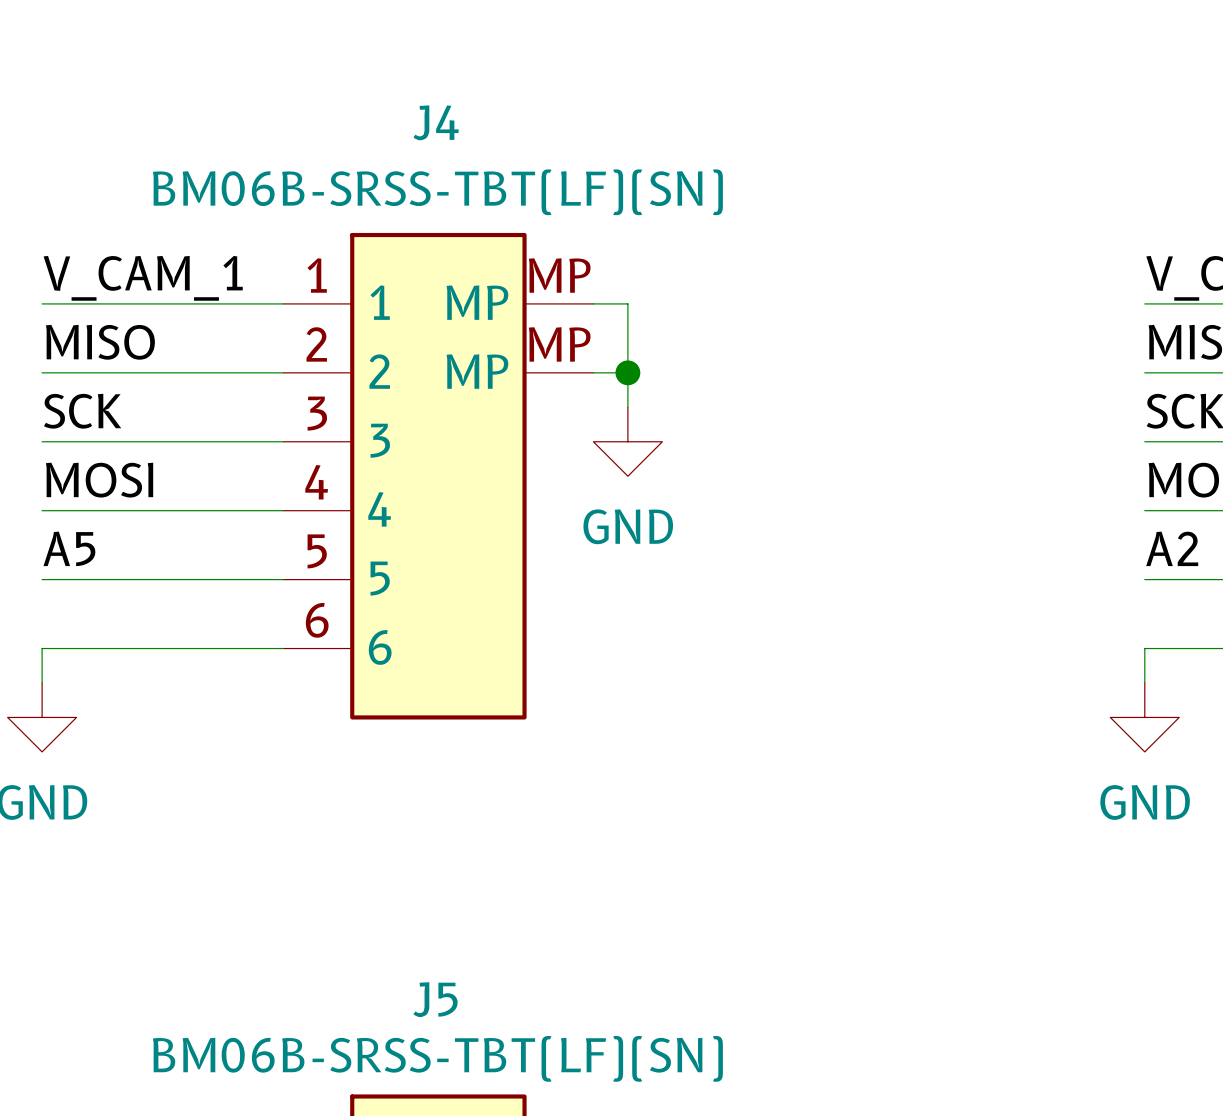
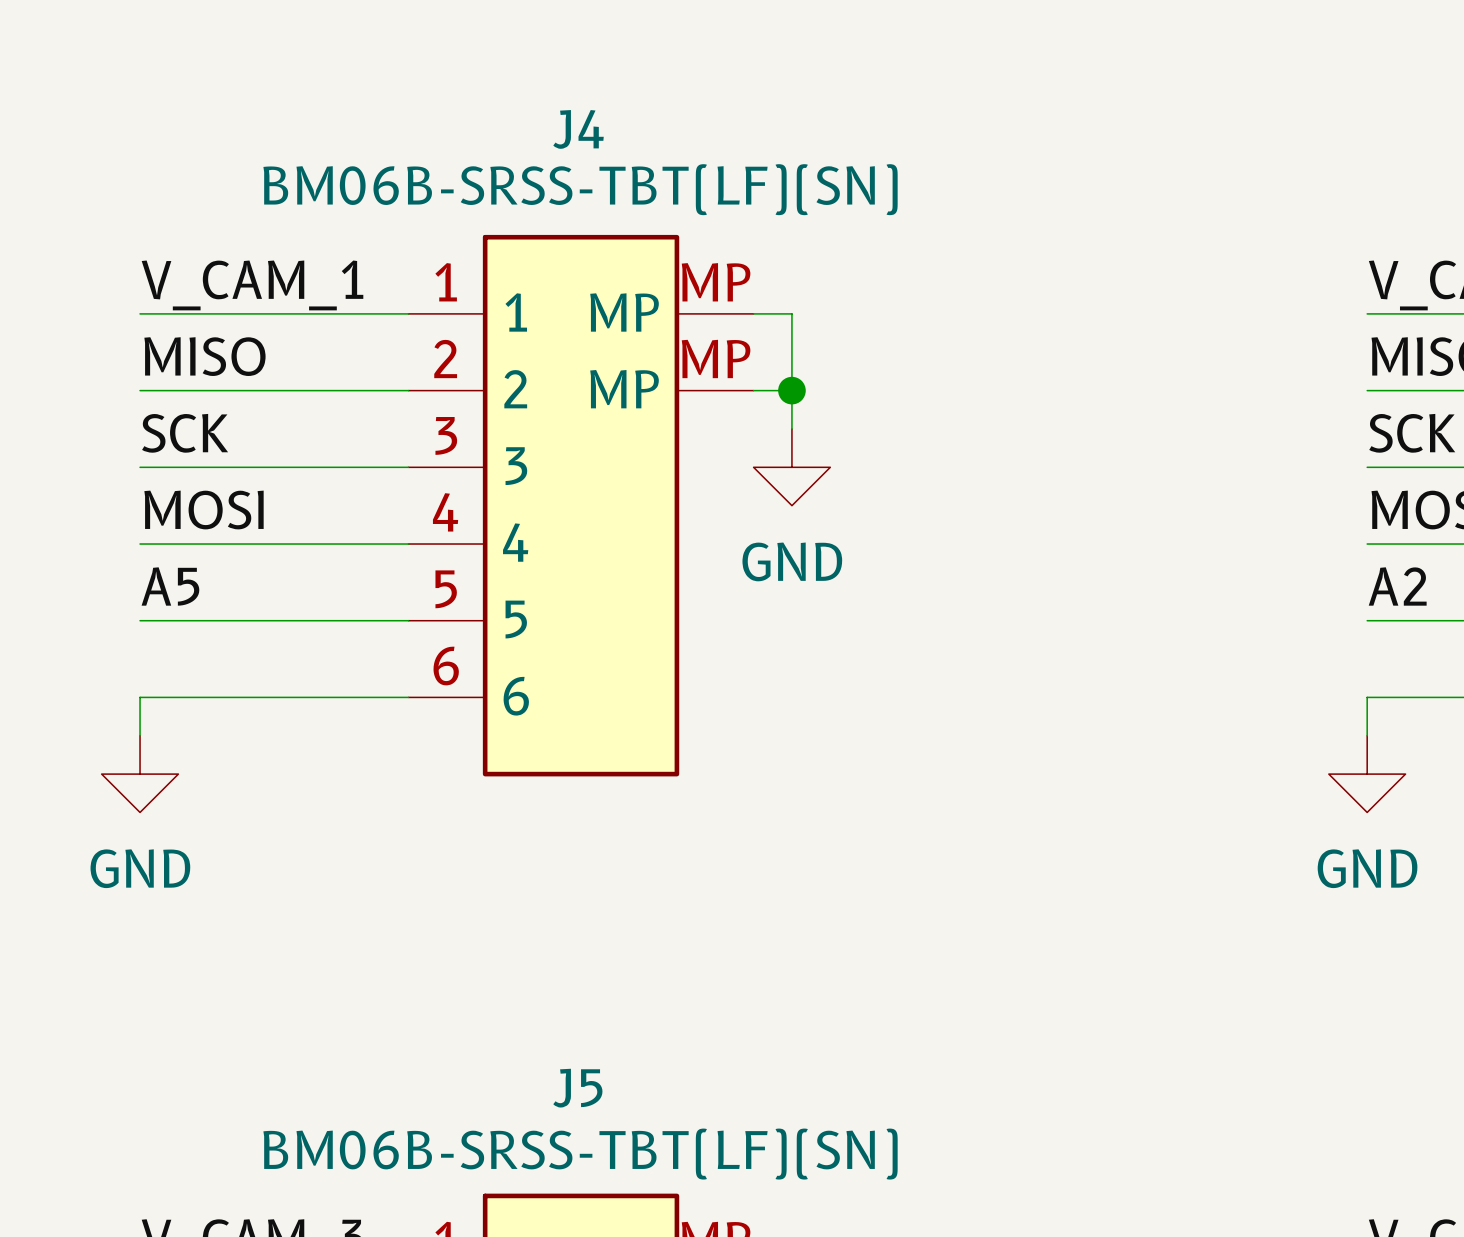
J4 name position: J4 (436, 122) -> J4 (578, 129)

